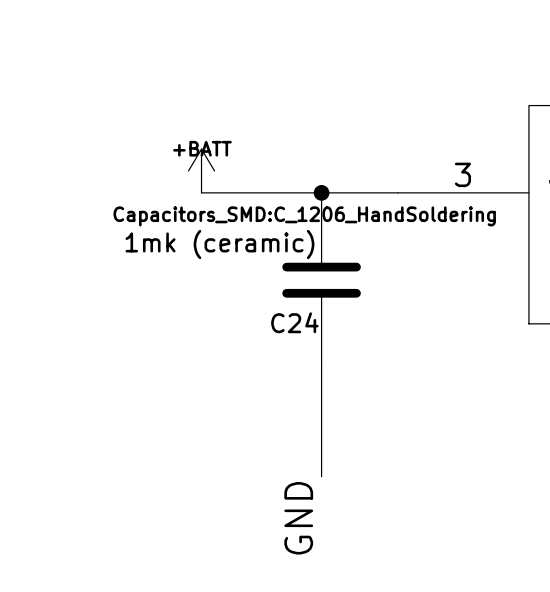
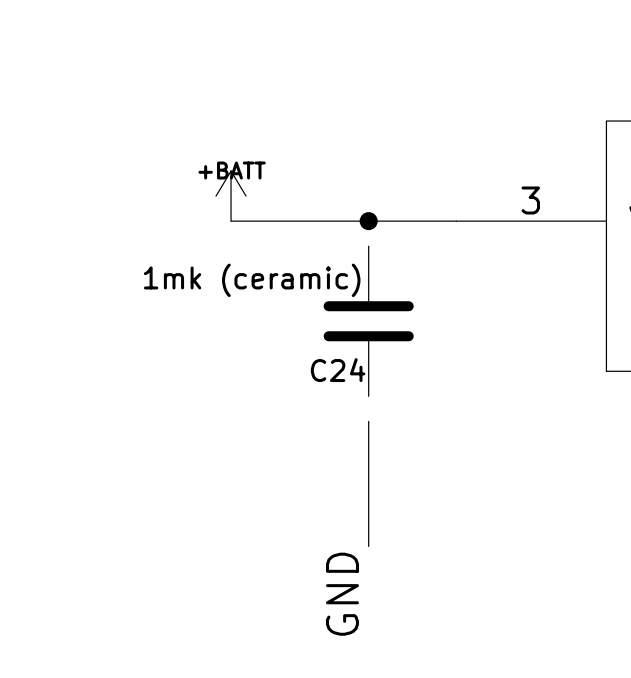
C24 symbol: [282, 192, 361, 368] -> [323, 246, 414, 397]
C24 text: Capacitors_SMD:C_1206_HandSoldering (304, 216) -> none

